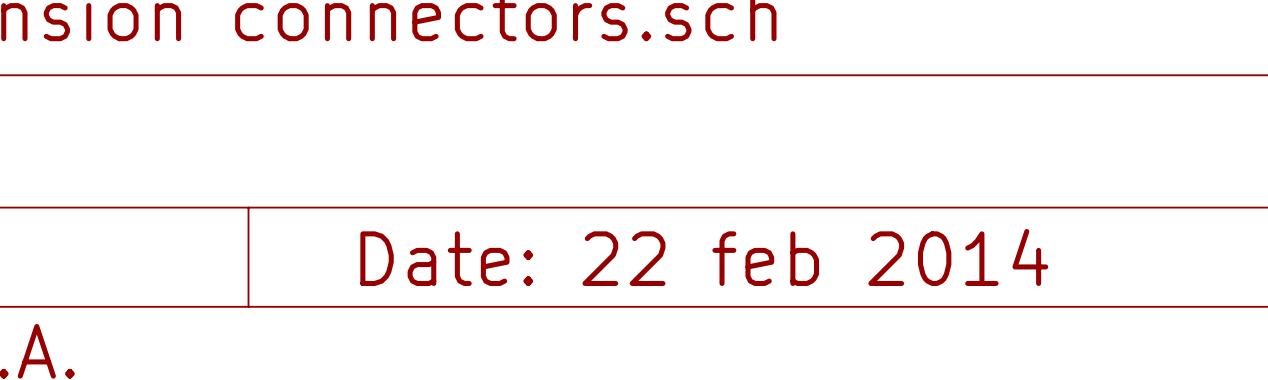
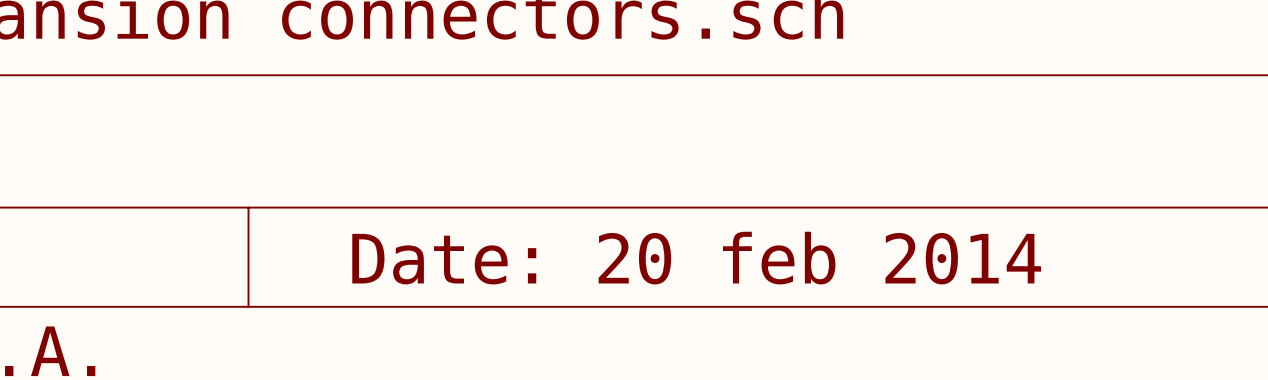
title block: Date: 22 feb 2014 (704, 257) -> Date: 20 feb 2014 (696, 258)

